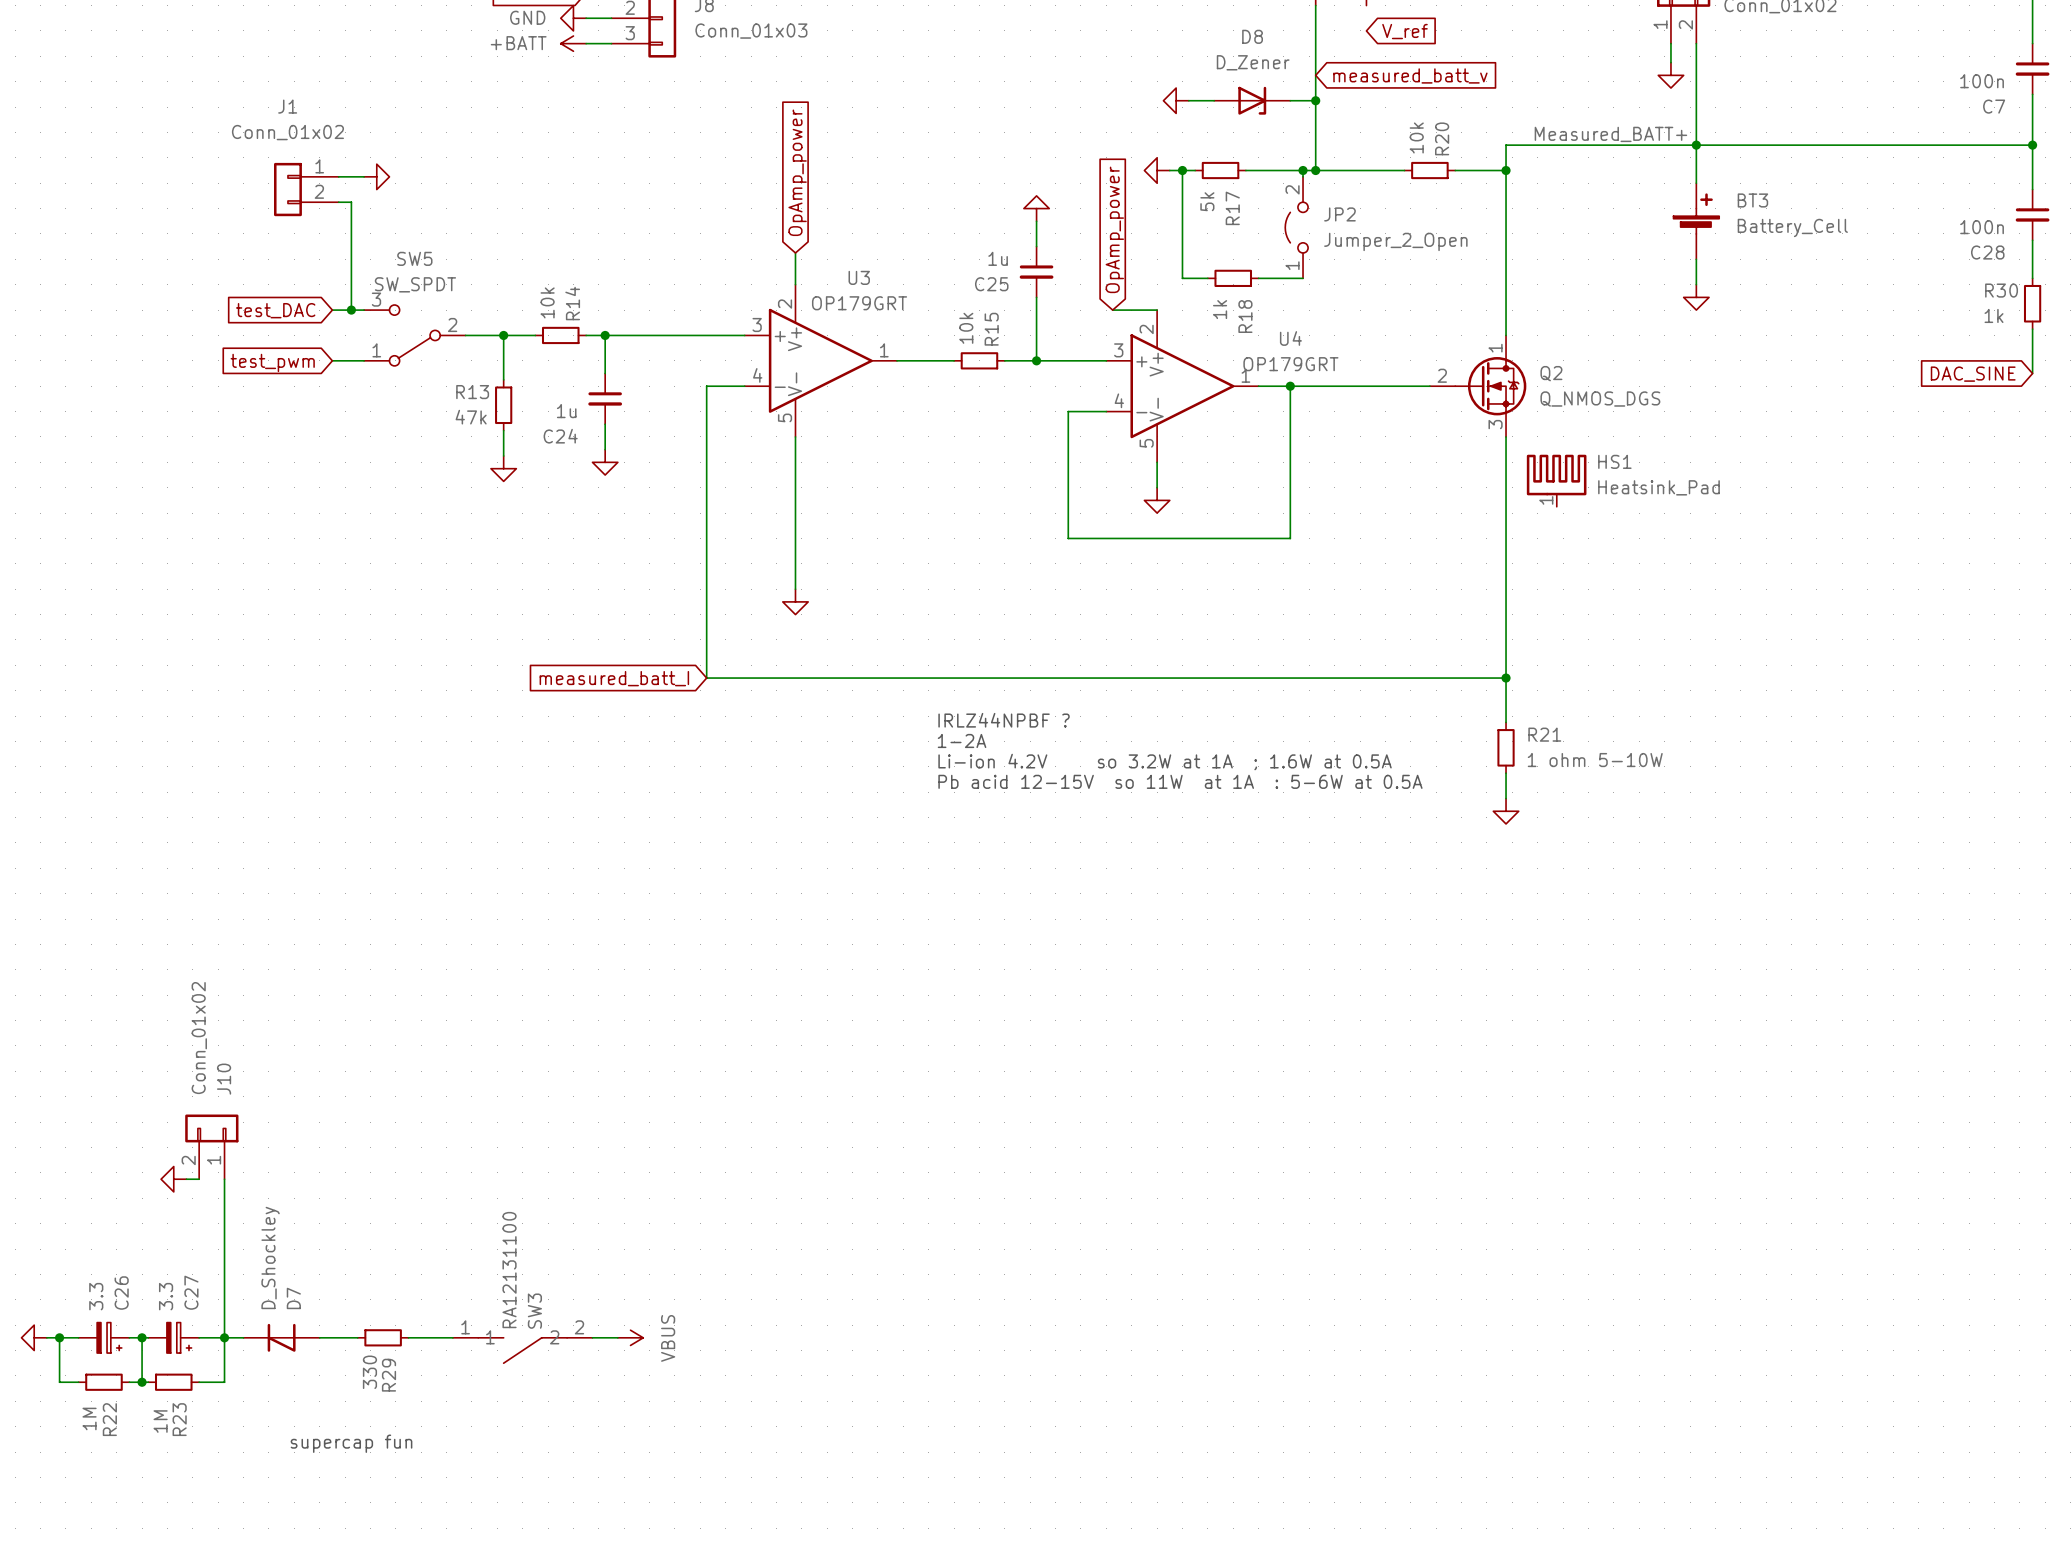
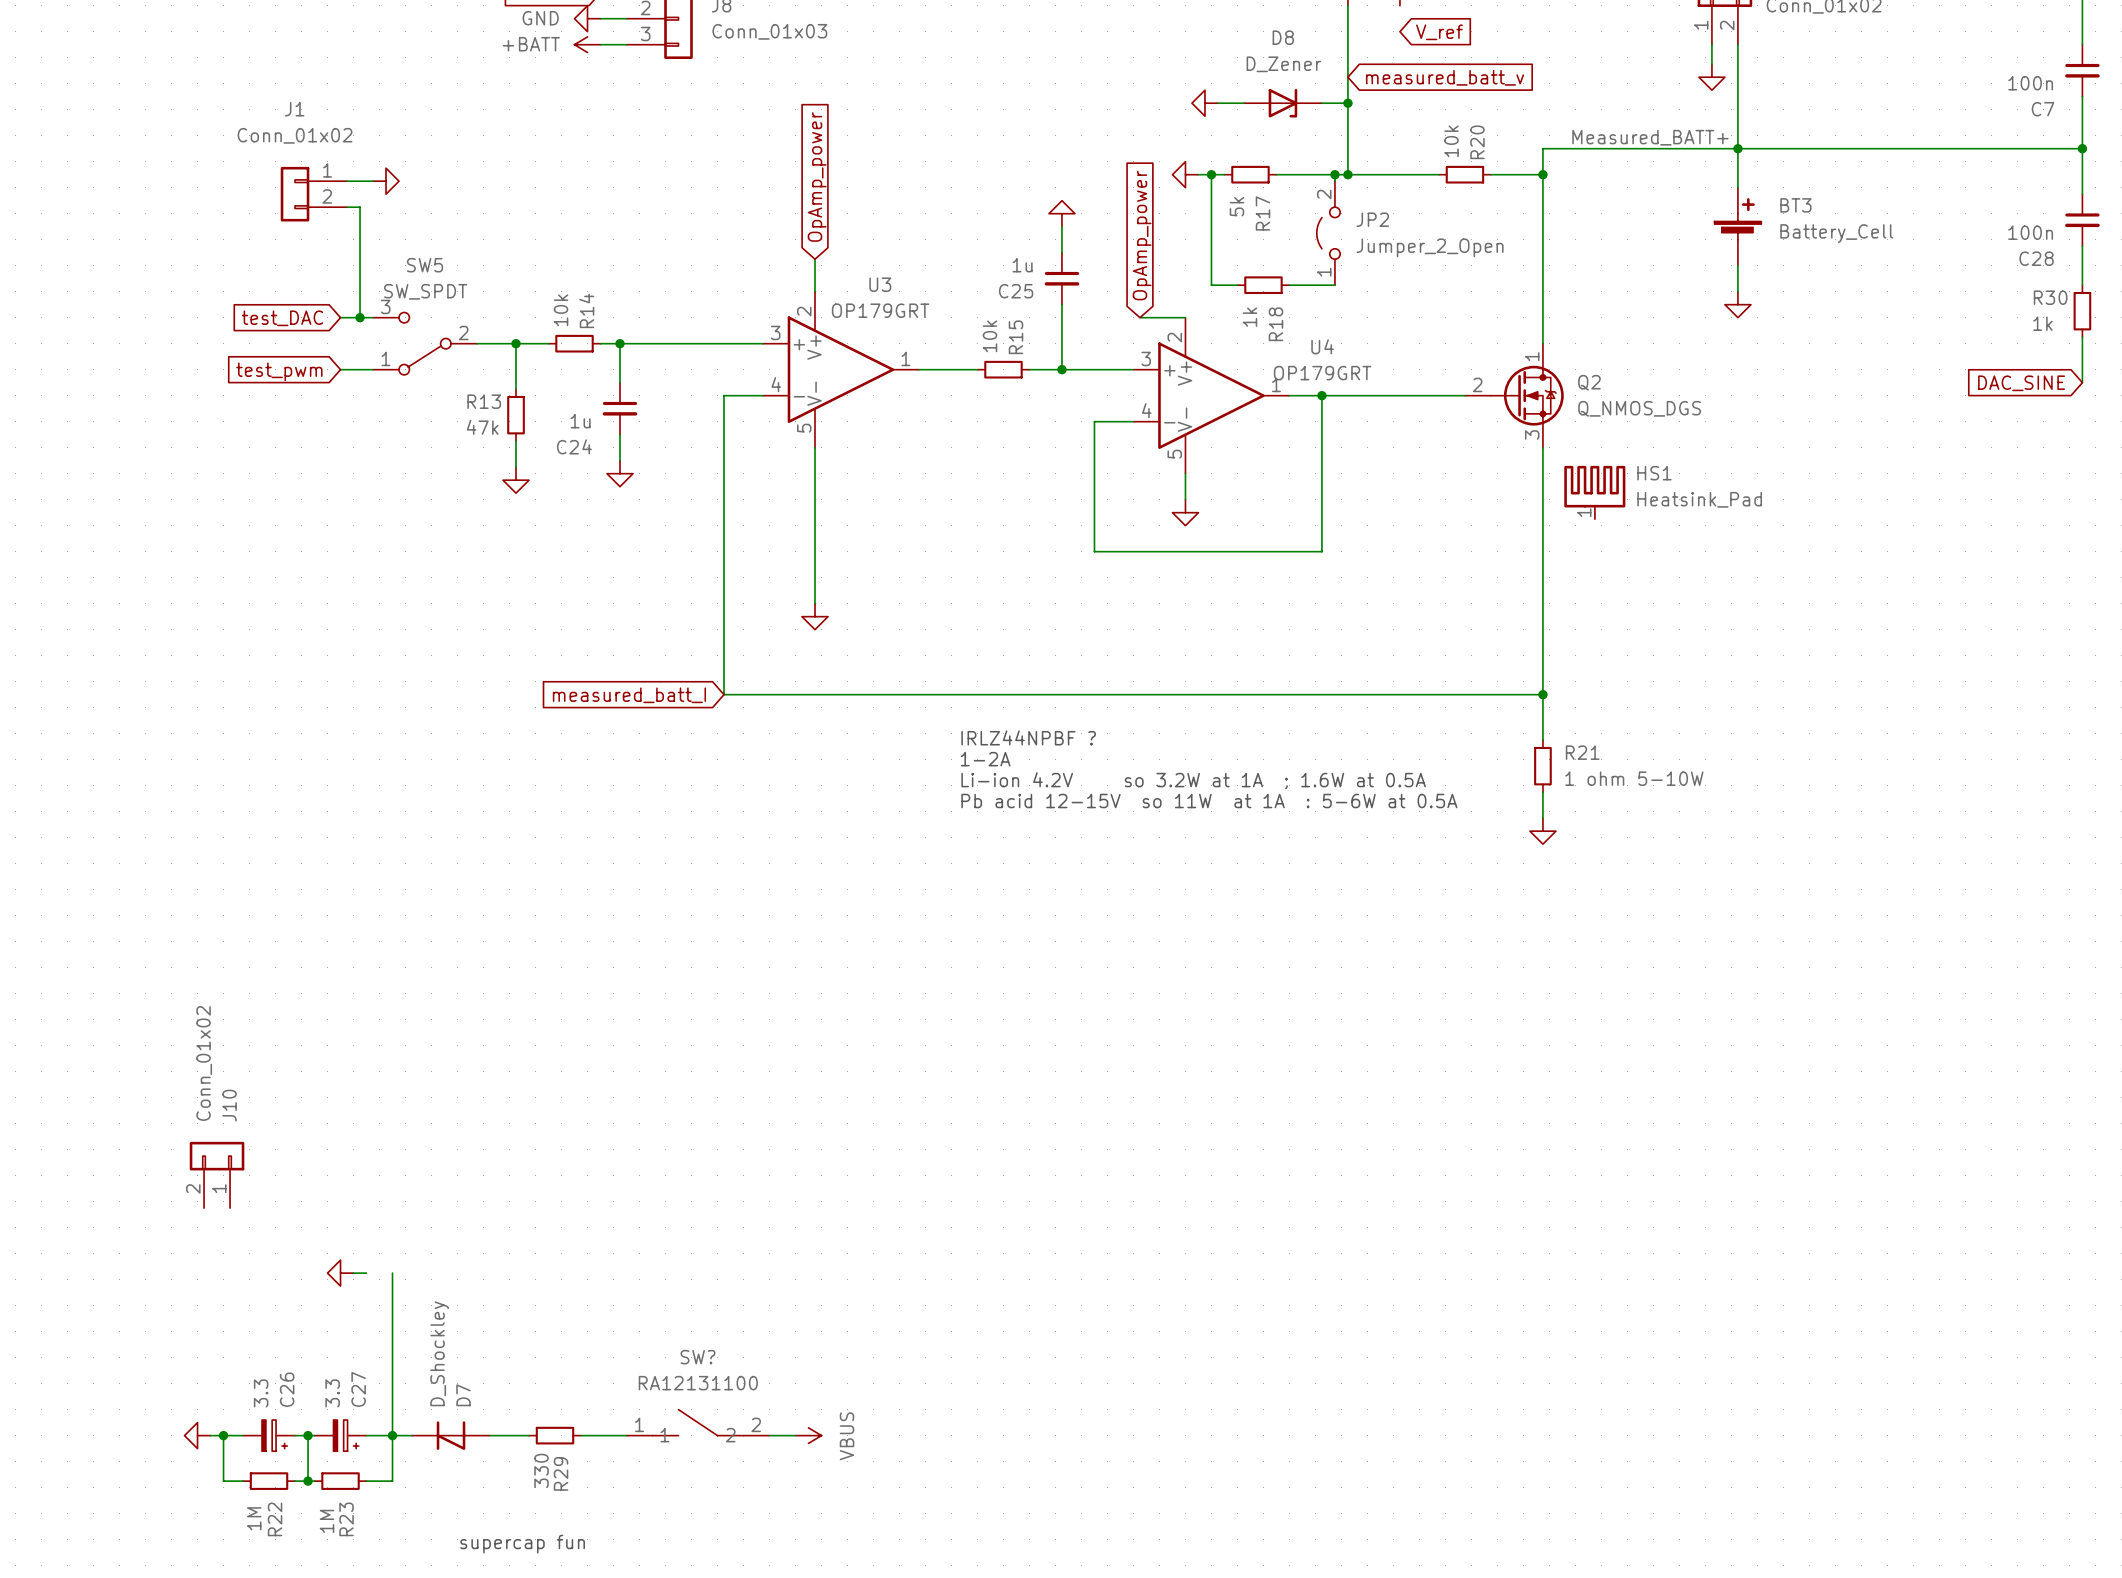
power symbol: (173, 1179) -> none
wire: (186, 1179) (199, 1179) -> (353, 1273) (366, 1273)
wire: (224, 1179) (224, 1382) (199, 1382) -> (392, 1273) (392, 1481) (366, 1481)
power symbol: none -> (340, 1273)
power symbol: (34, 1337) -> none
wire: (46, 1337) (78, 1337) -> (210, 1435) (243, 1435)
wire: (59, 1337) (59, 1382) (78, 1382) -> (223, 1435) (223, 1481) (243, 1481)
junction: (59, 1337) -> none
C26 position: (103, 1337) -> (269, 1435)
wire: (129, 1337) (148, 1337) -> (295, 1435) (314, 1435)
wire: (142, 1337) (142, 1382) -> (308, 1435) (308, 1481)
junction: (142, 1337) -> none
C27 position: (173, 1337) -> (340, 1435)
wire: (199, 1337) (243, 1337) -> (366, 1435) (412, 1435)
junction: (224, 1337) -> none
D7 position: (281, 1337) -> (451, 1435)
wire: (319, 1337) (357, 1337) -> (490, 1435) (529, 1435)
R29 position: (383, 1337) -> (555, 1435)
wire: (408, 1337) (452, 1337) -> (581, 1435) (626, 1435)
wire: (592, 1337) (617, 1337) -> (769, 1435) (795, 1435)
power symbol position: VBUS (630, 1337) -> VBUS (808, 1435)
SW3: RA12131100 (522, 1350) -> none
R22 position: (103, 1382) -> (269, 1481)
wire: (129, 1382) (148, 1382) -> (295, 1481) (314, 1481)
junction: (142, 1382) -> none
R23 position: (173, 1382) -> (340, 1481)
SW?: none -> RA12131100 (698, 1422)
power symbol: none -> (197, 1435)
junction: none -> (223, 1435)
junction: none -> (308, 1435)
junction: none -> (392, 1435)
text position: supercap fun (351, 1443) -> supercap fun (522, 1544)
junction: none -> (308, 1481)

